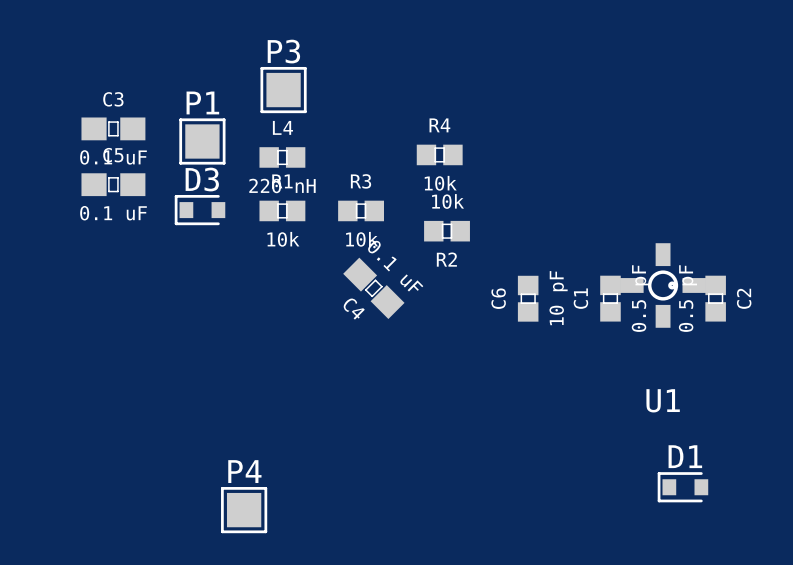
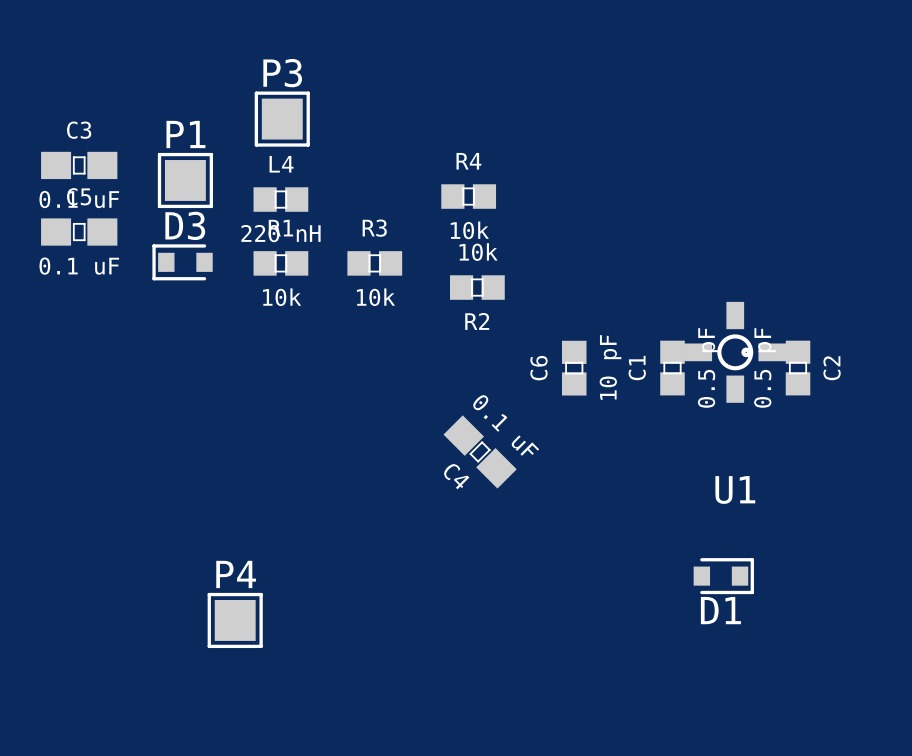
C4 position: (373, 288) -> (480, 451)
D1 rotation: 0° (682, 487) -> 180° (723, 576)
D1 position: (682, 487) -> (723, 576)

